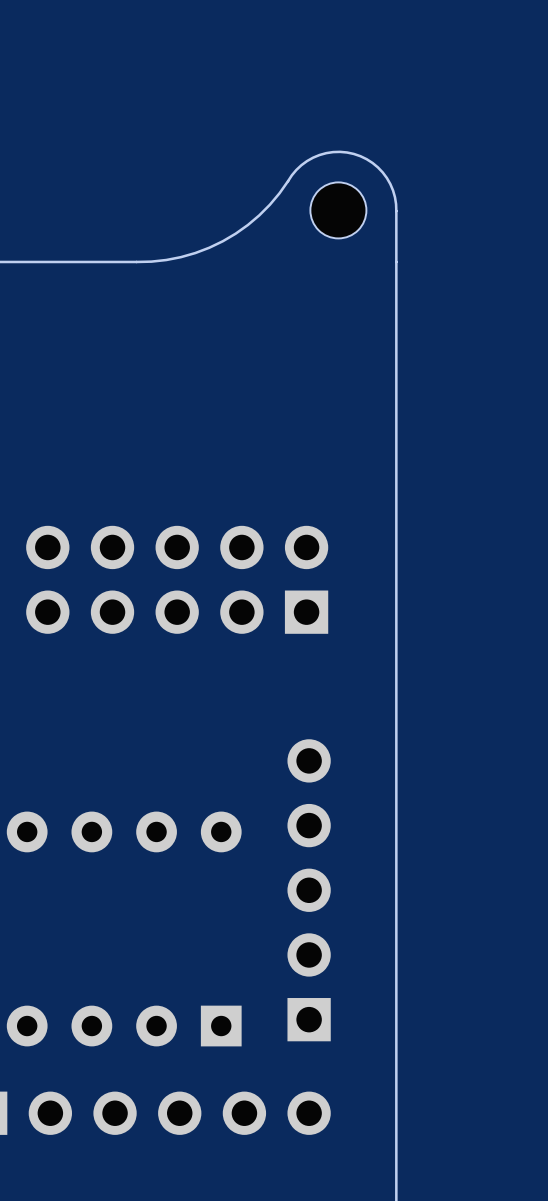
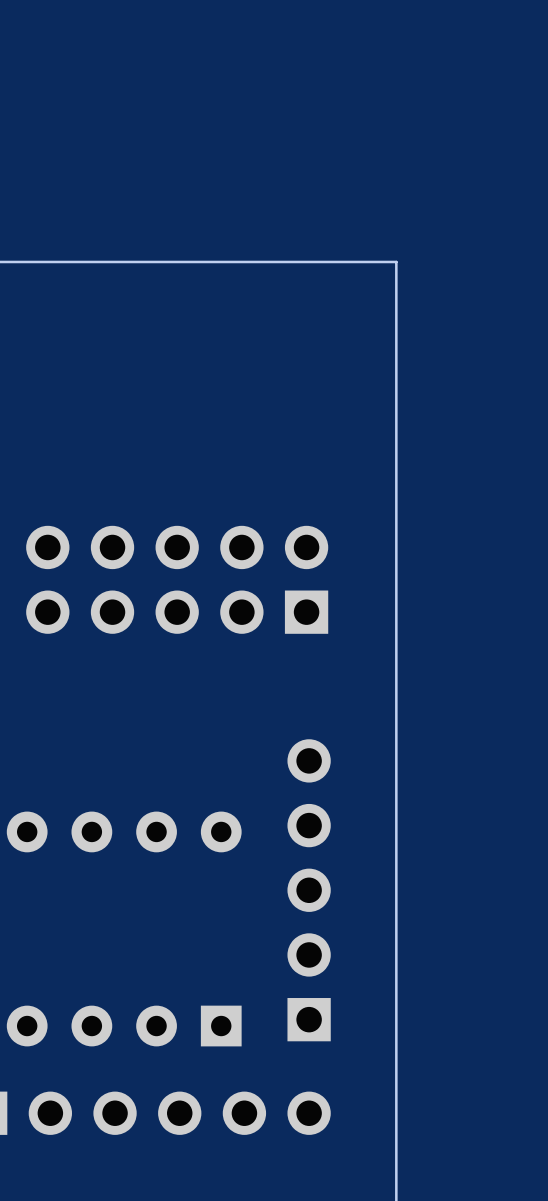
part: (338, 210) -> none
board edge: (396, 261) (396, 204) (390, 184) (382, 172) (372, 162) (360, 156) (340, 151) (319, 155) (301, 165) (259, 215) (222, 241) (181, 257) (136, 261) -> (396, 261) (136, 261)

